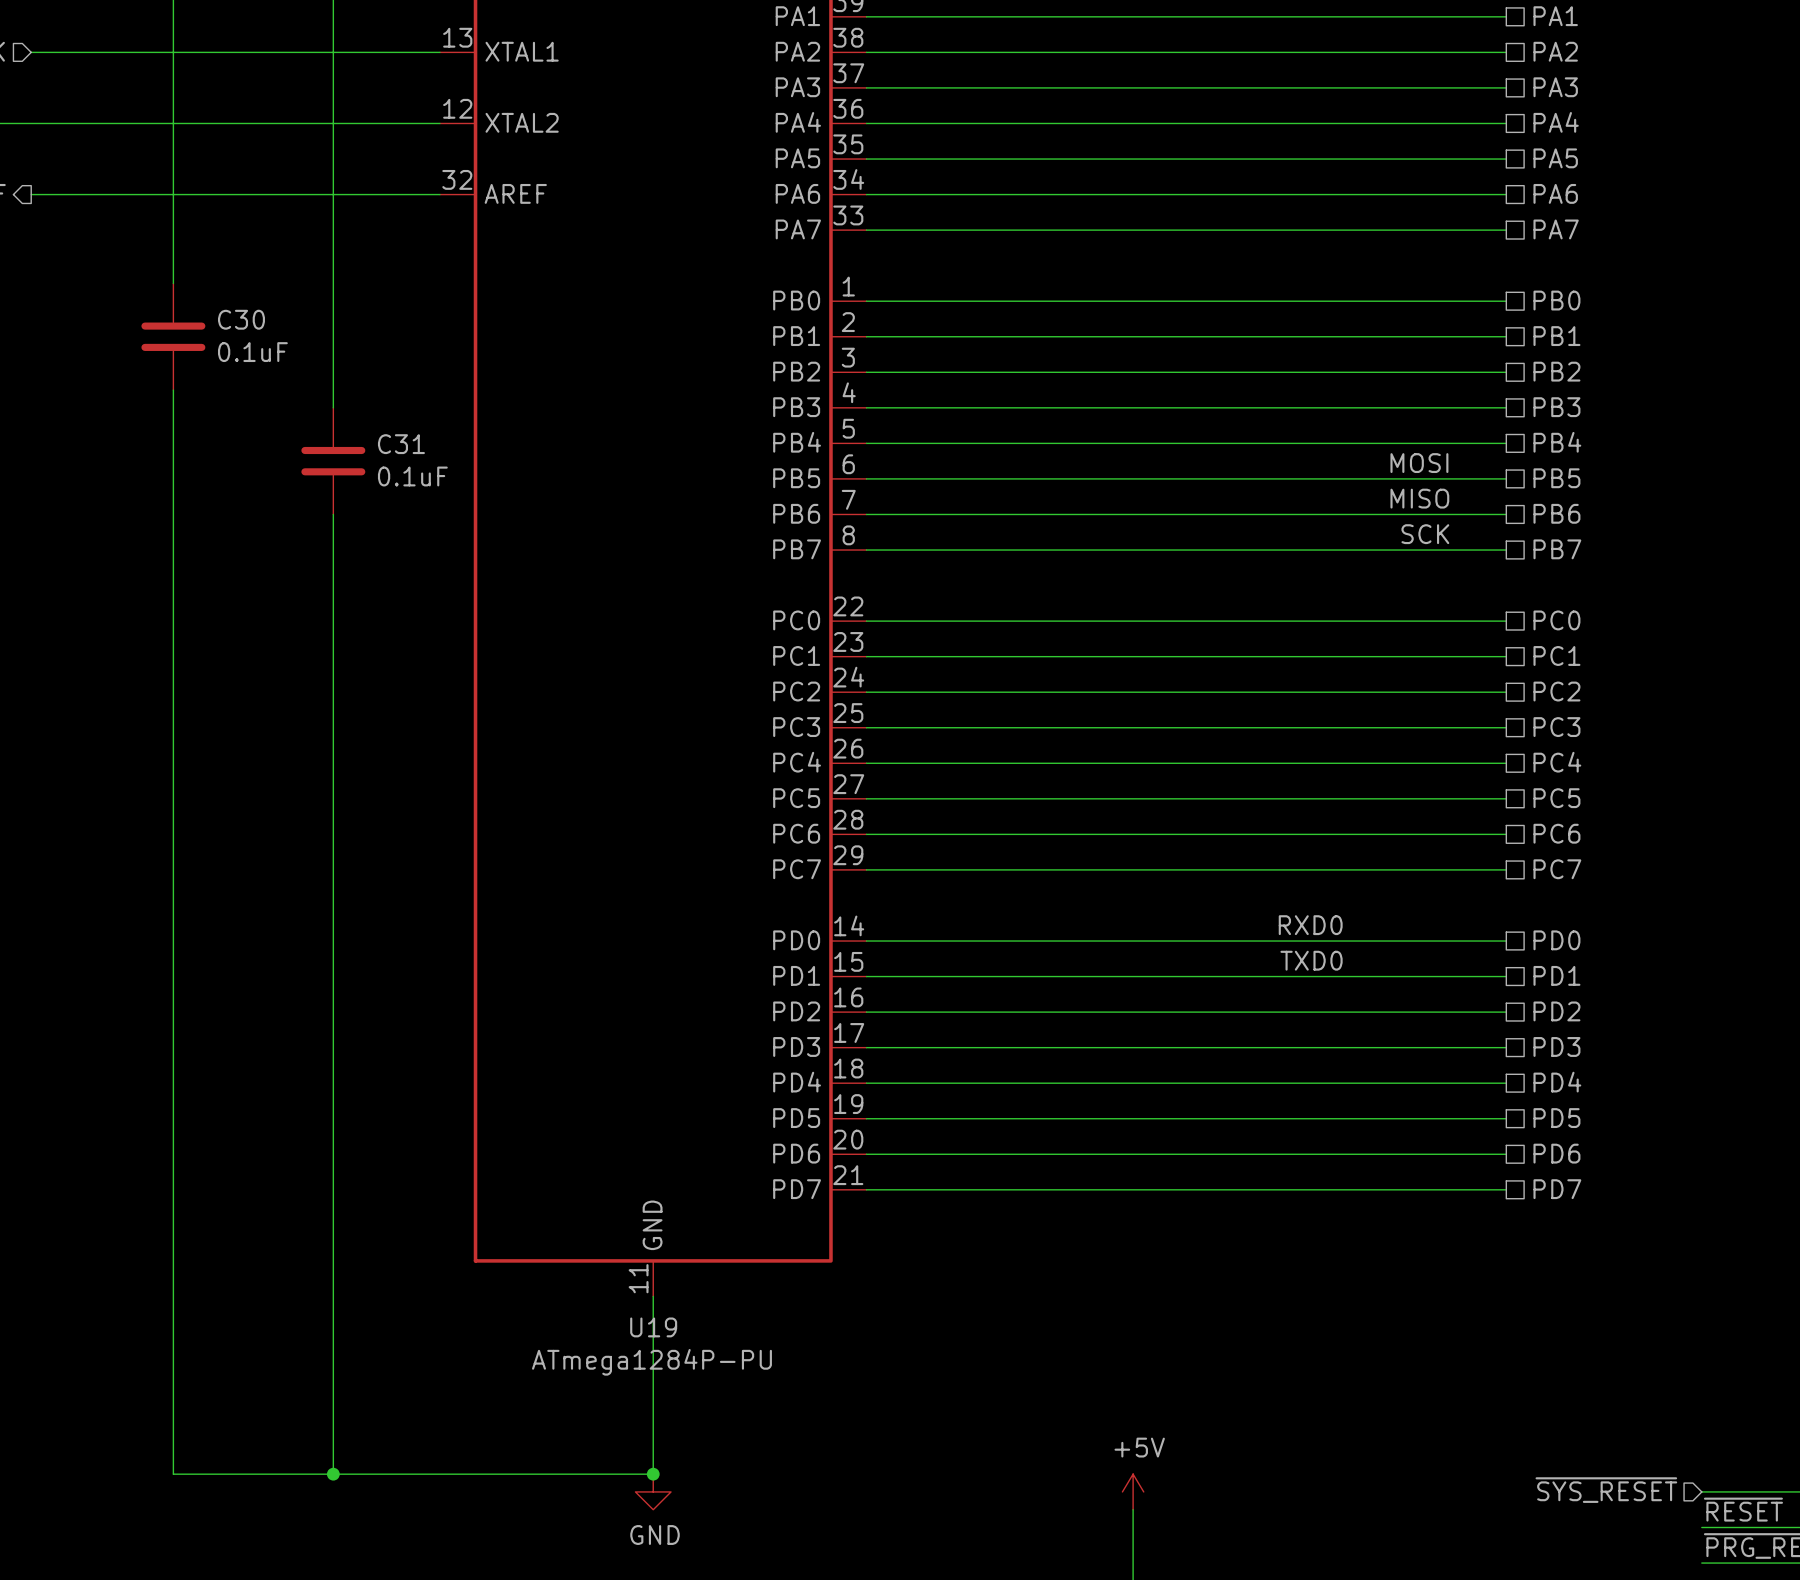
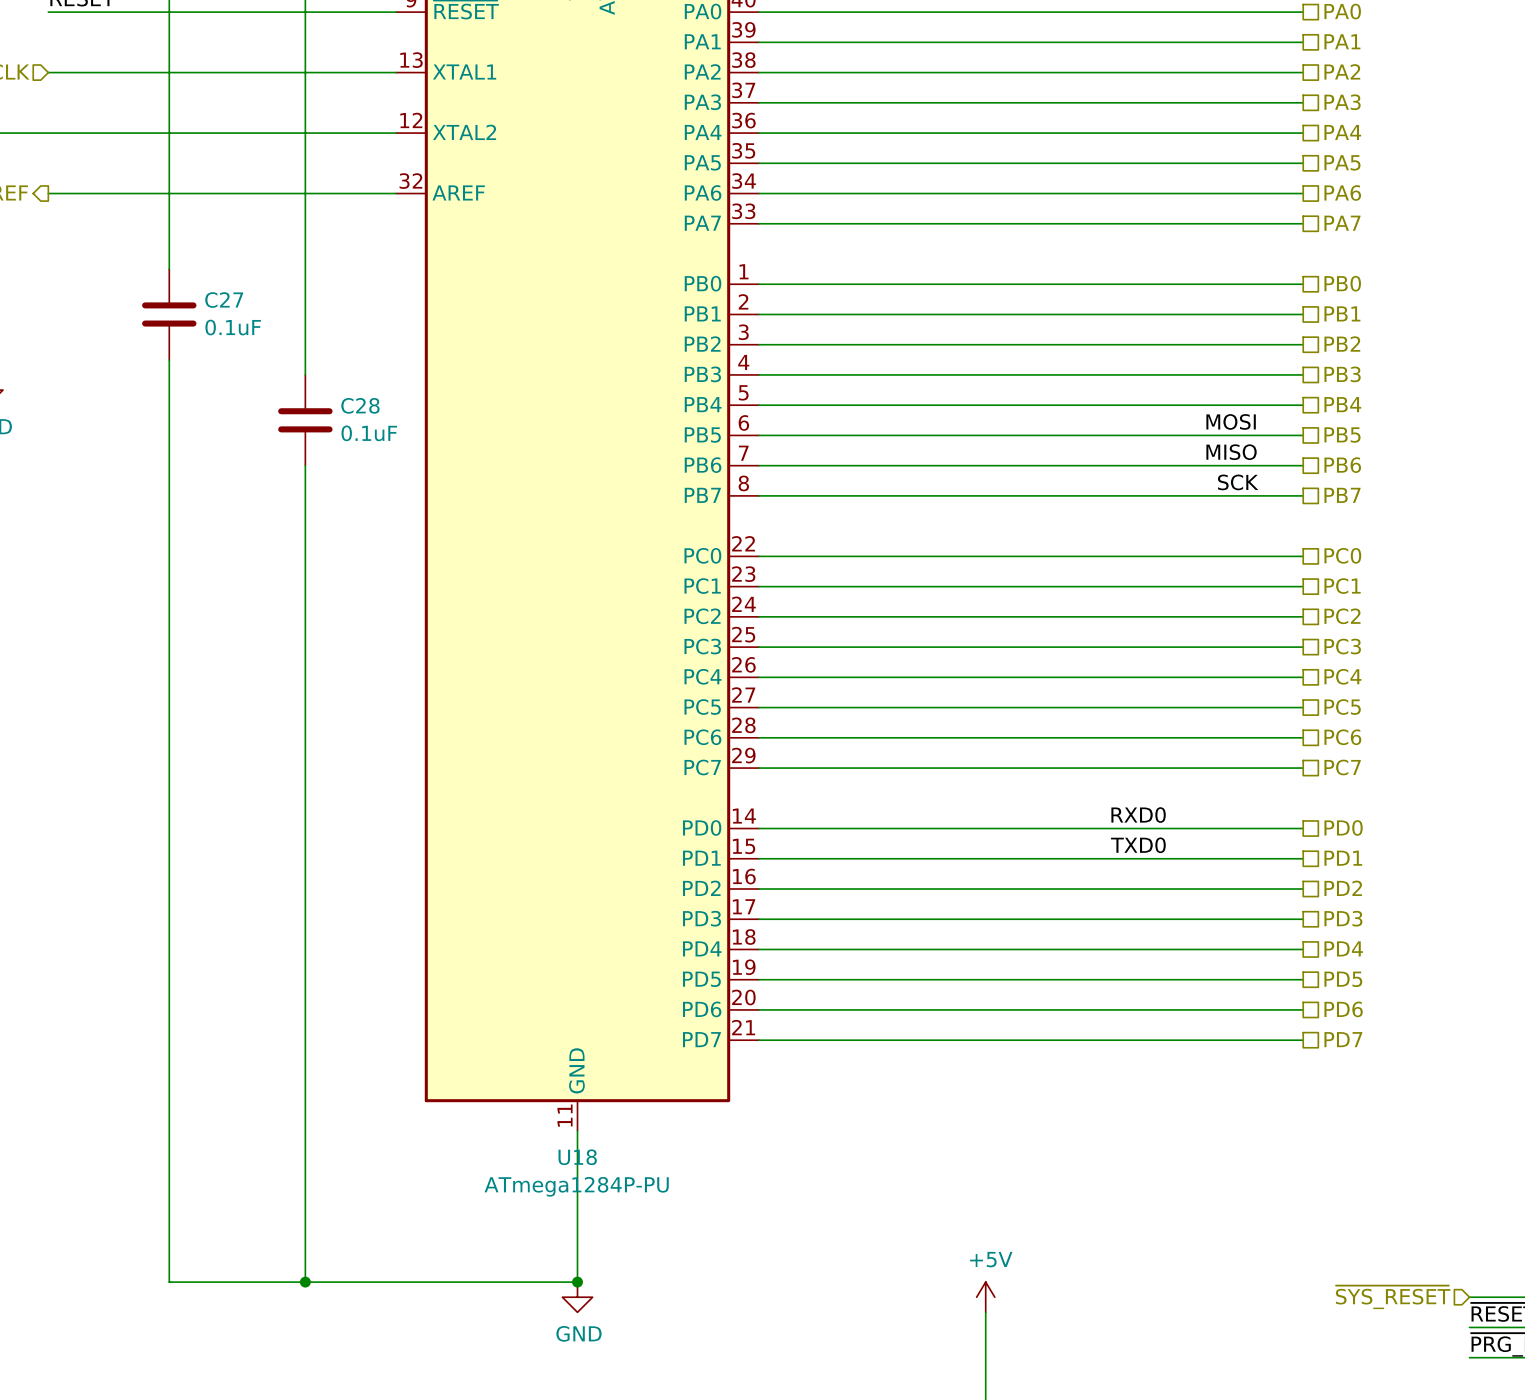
C30 name: C30 (241, 319) -> C27 (224, 300)
C31 name: C31 (401, 444) -> C28 (360, 405)
U19 name: U19 (653, 1327) -> U18 (577, 1157)

